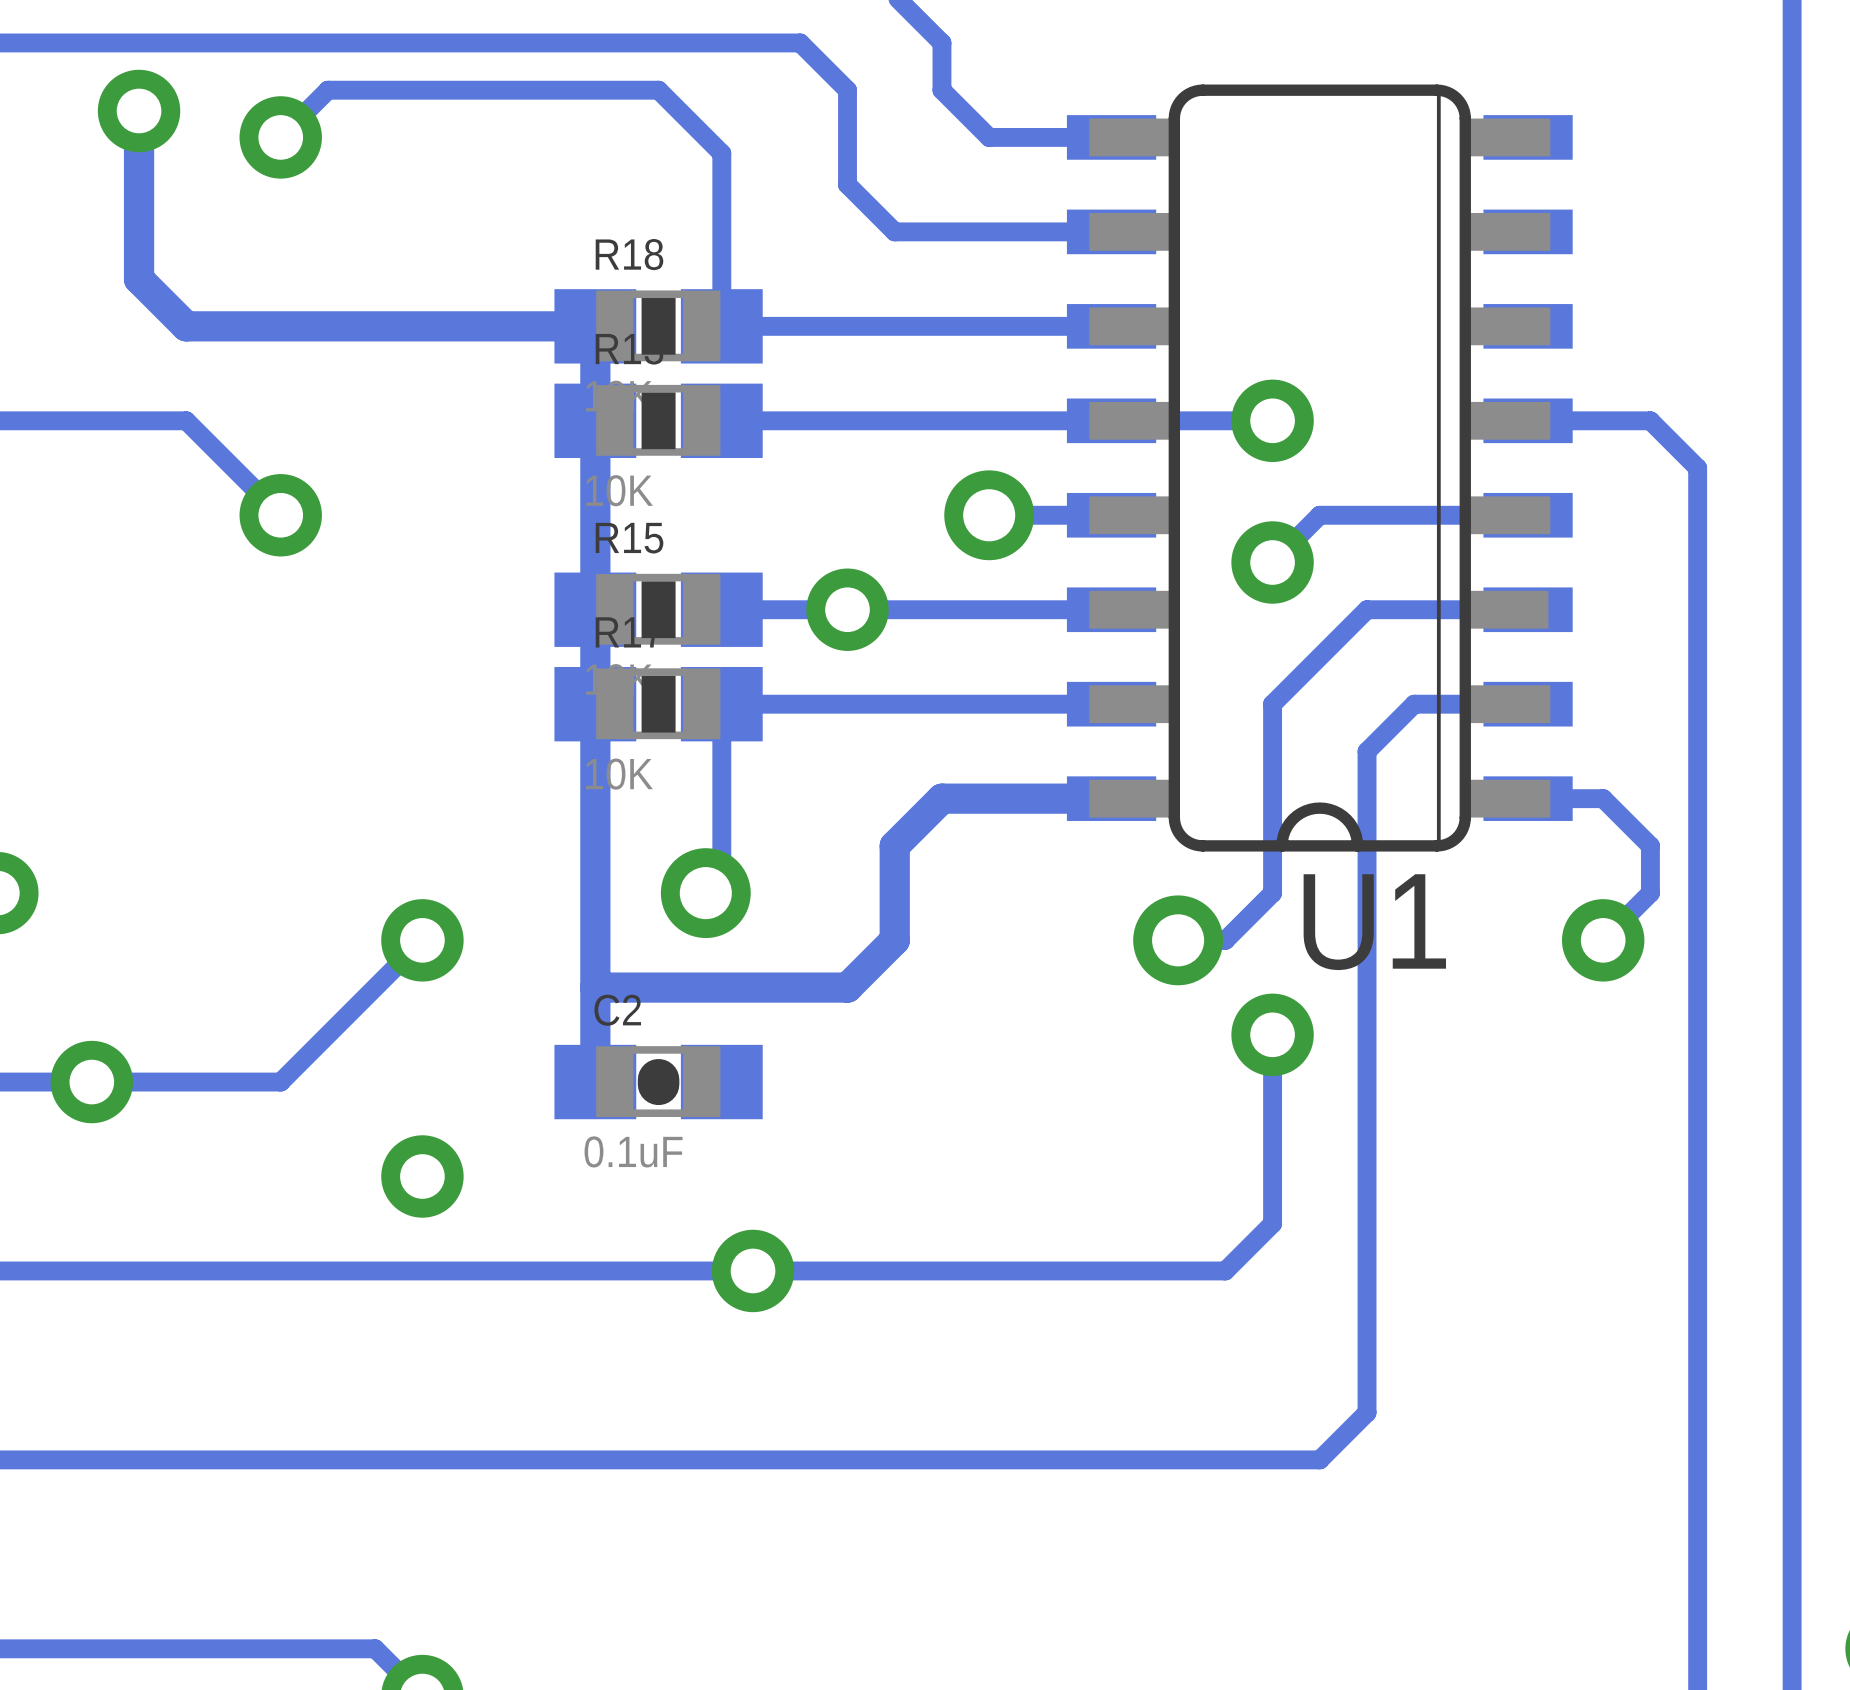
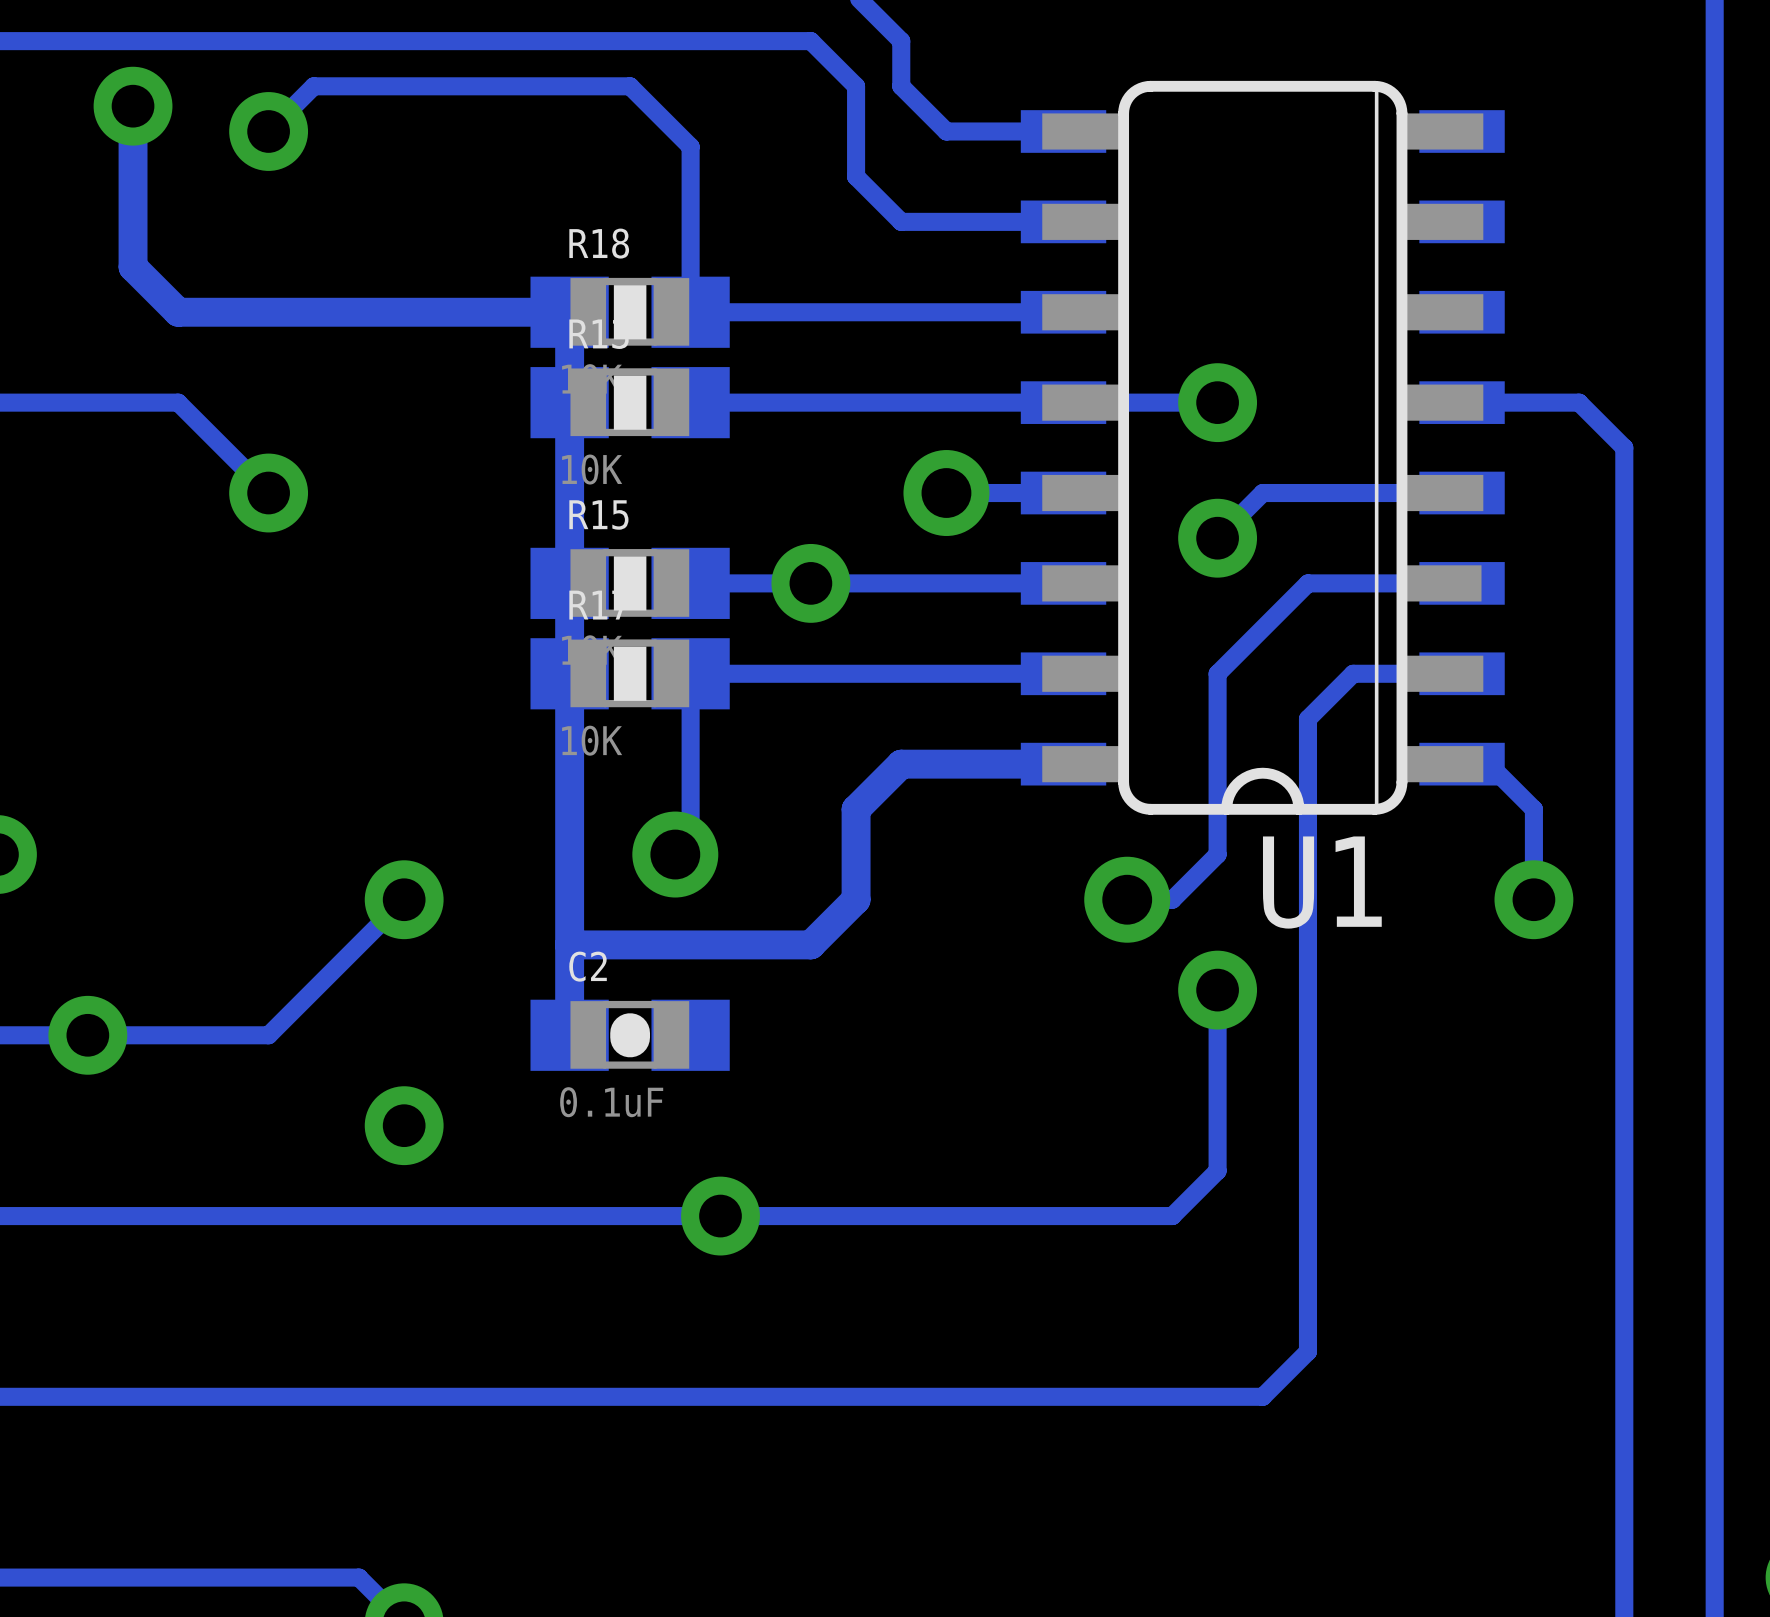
track: (800, 42) (847, 90) (847, 184) (894, 231) (941, 231) -> (765, 41) (810, 41) (856, 86) (856, 176) (901, 221)
track: (1555, 798) (1603, 798) (1650, 845) (1650, 893) (1603, 940) -> (1488, 764) (1533, 809) (1533, 899)

